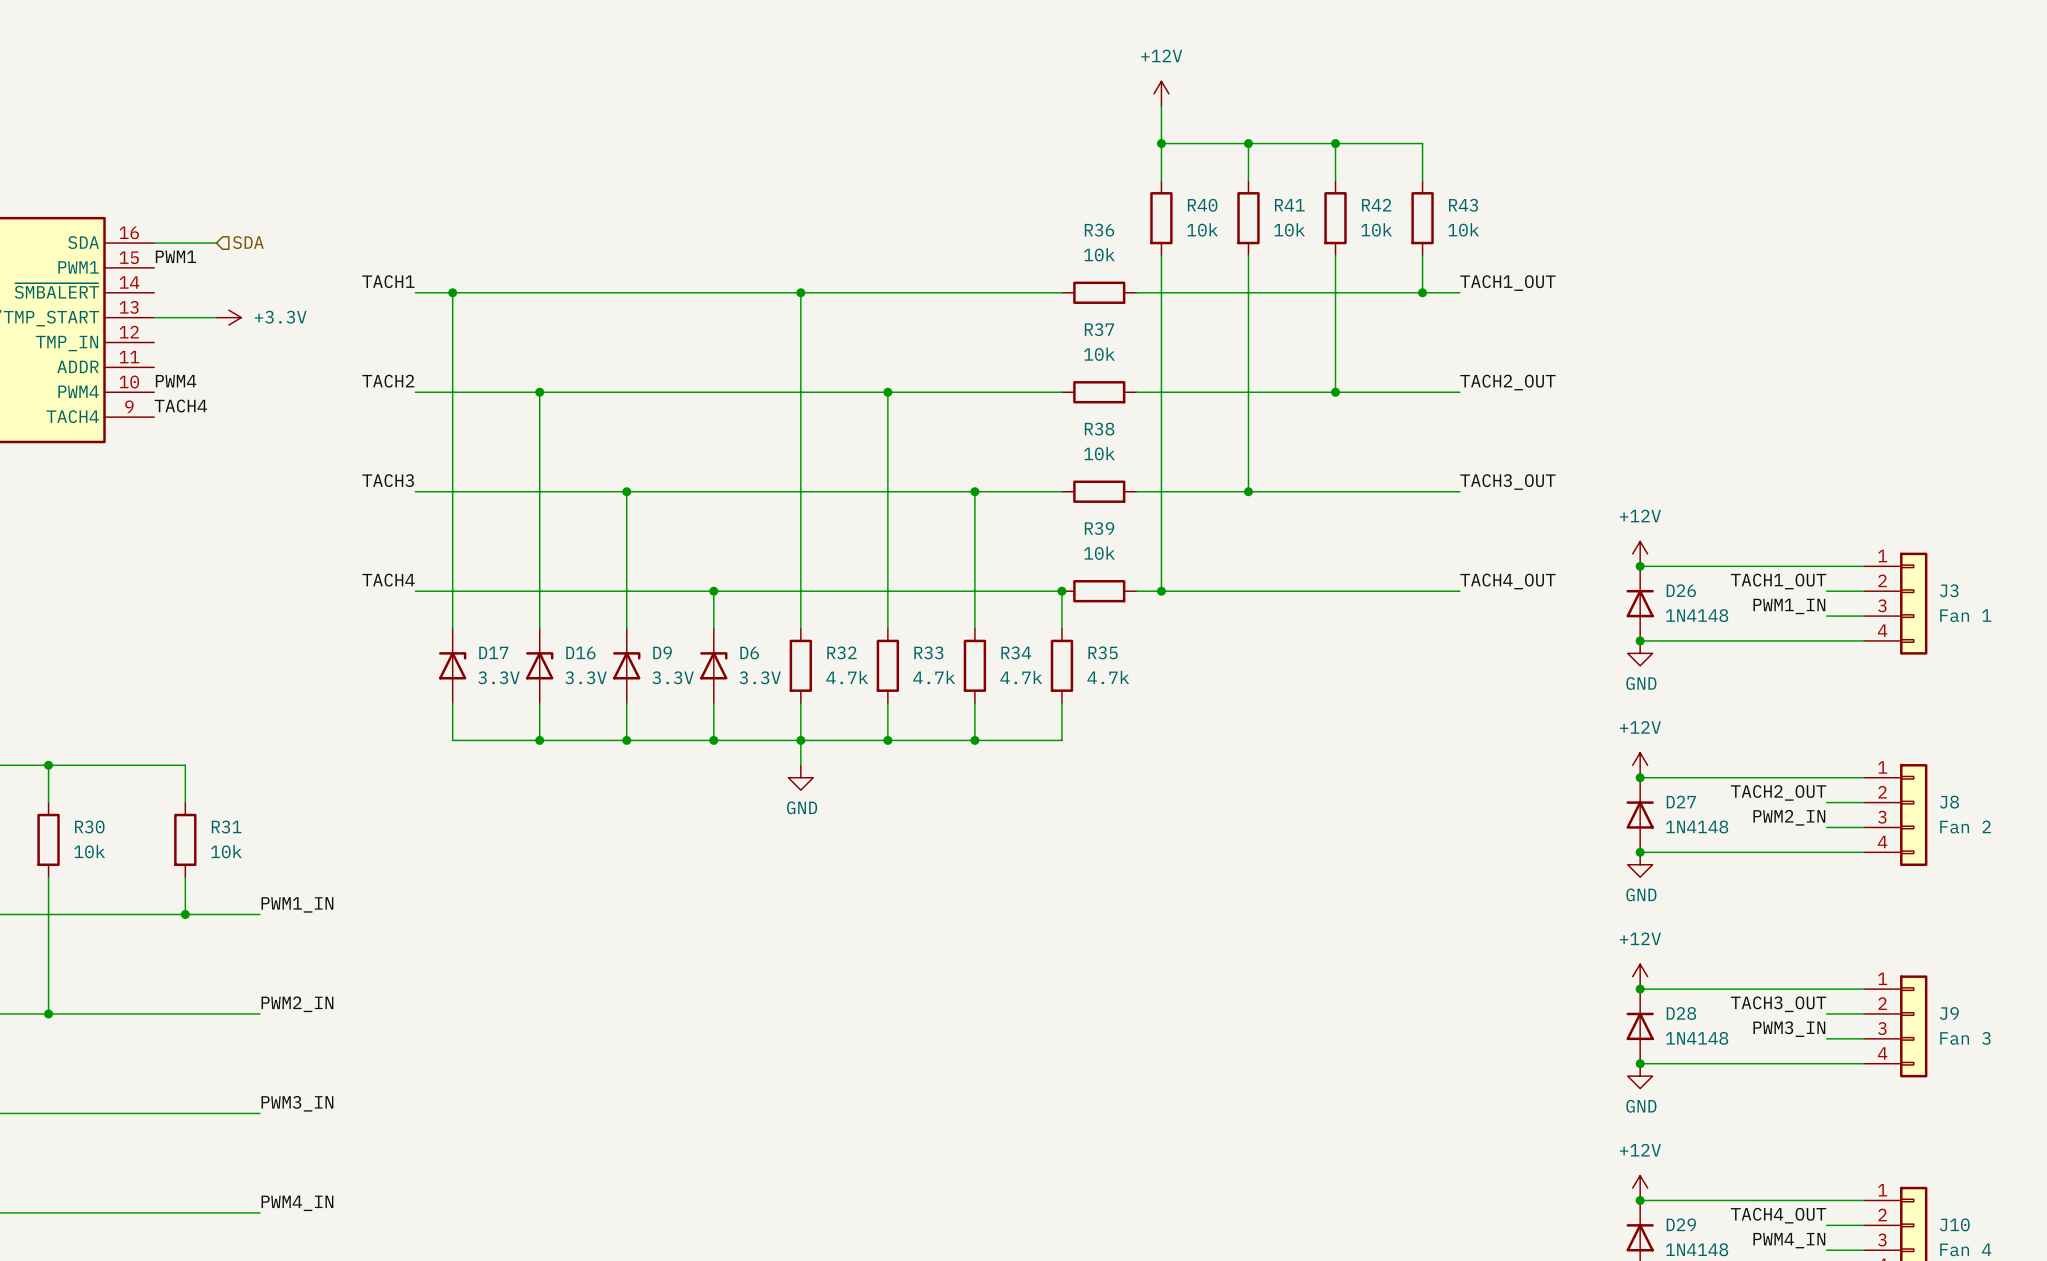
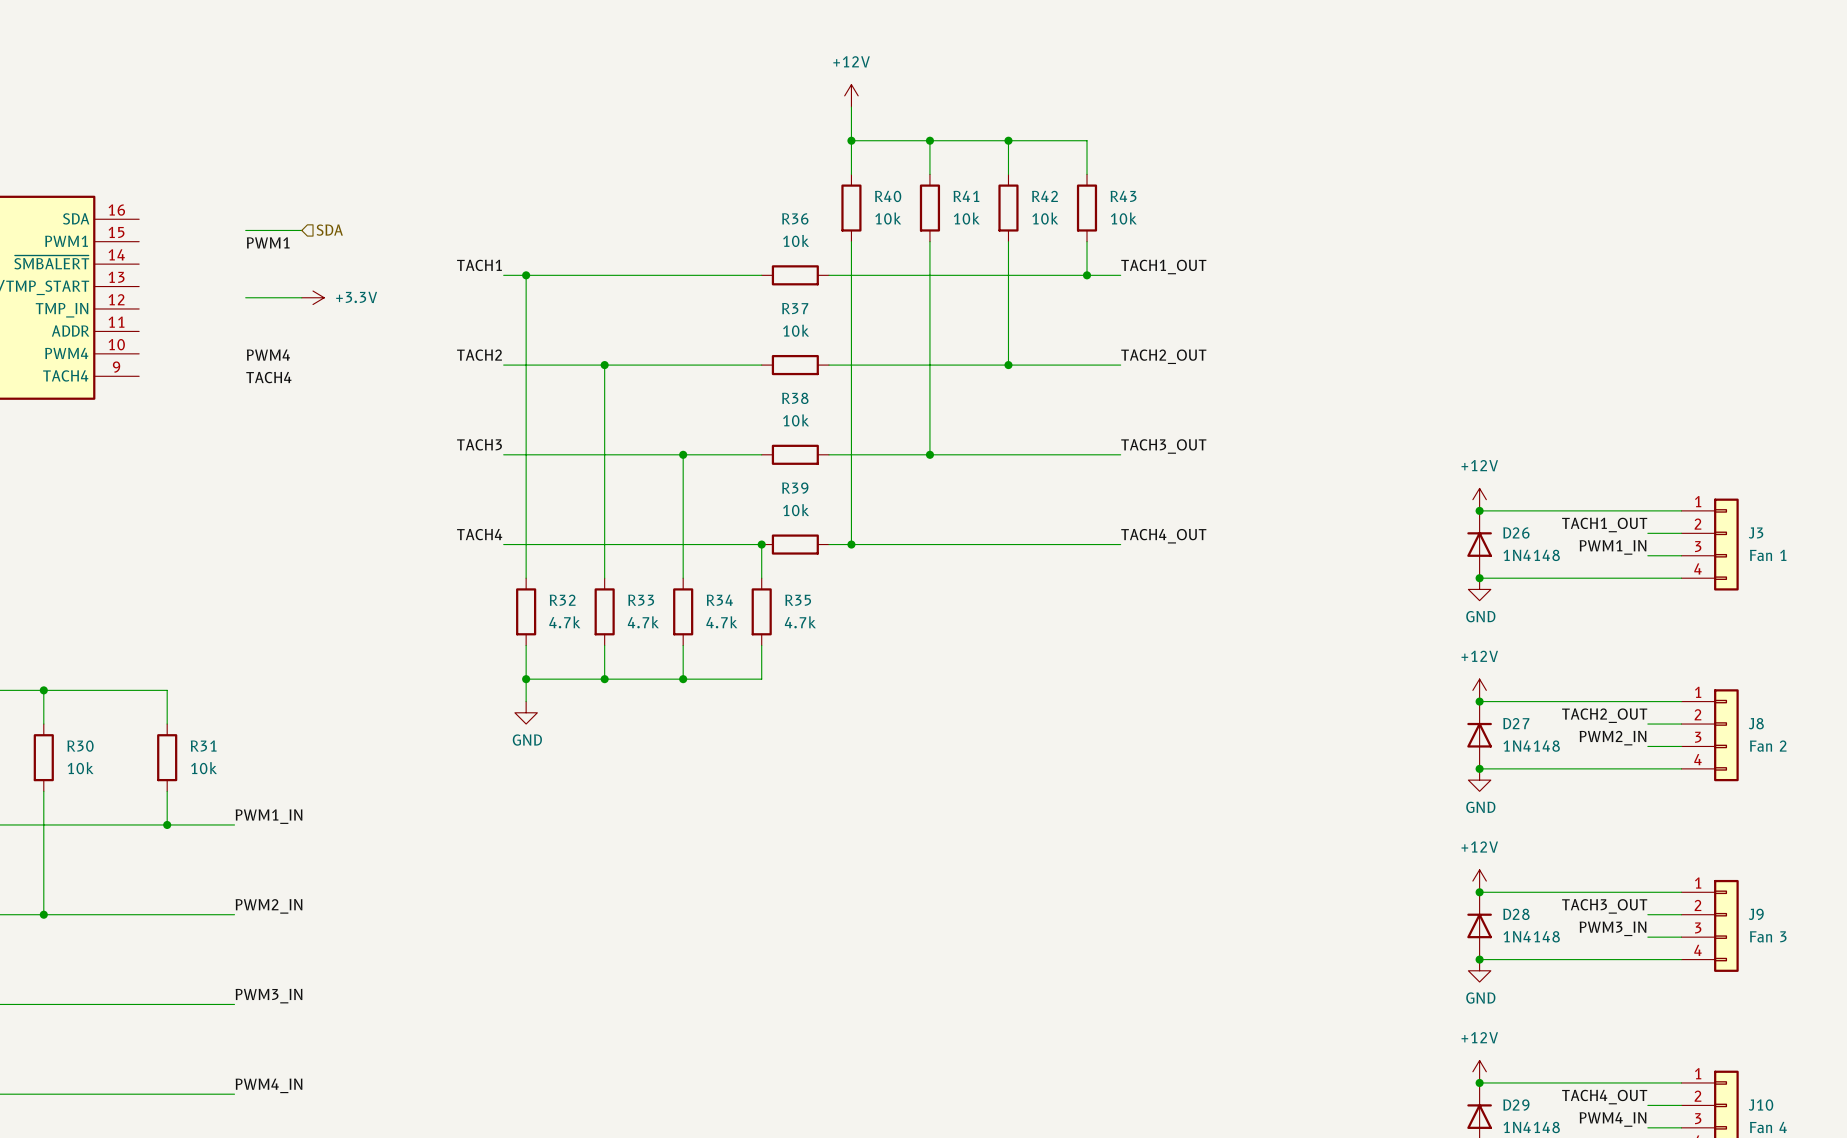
power symbol position: +12V (1161, 93) -> +12V (851, 95)
wire: (1161, 106) (1161, 180) -> (851, 107) (851, 174)
wire: (1161, 143) (1422, 143) (1422, 180) -> (851, 140) (1087, 140) (1087, 174)
junction position: (1161, 143) -> (1008, 140)
wire: (1248, 143) (1248, 180) -> (929, 140) (929, 174)
junction: (1248, 143) -> none
wire: (1335, 143) (1335, 180) -> (1008, 140) (1008, 174)
junction: (1335, 143) -> none
junction: none -> (851, 140)
junction: none -> (929, 140)
R40 position: (1161, 218) -> (851, 208)
R41 position: (1248, 218) -> (929, 208)
R42 position: (1335, 218) -> (1008, 208)
R43 position: (1422, 218) -> (1087, 208)
hierarchical label position: SDA (248, 242) -> SDA (329, 230)
wire: (154, 243) (216, 243) -> (245, 230) (301, 230)
wire: (1161, 255) (1161, 591) -> (851, 241) (851, 544)
wire: (1248, 255) (1248, 491) -> (929, 241) (929, 454)
wire: (1335, 255) (1335, 392) -> (1008, 241) (1008, 365)
wire: (1422, 255) (1422, 292) -> (1087, 241) (1087, 275)
label position: PWM1 (176, 256) -> PWM1 (268, 242)
label position: TACH1 (388, 281) -> TACH1 (479, 265)
label position: TACH1_OUT (1507, 283) -> TACH1_OUT (1163, 267)
wire: (415, 292) (1061, 292) -> none
wire: (452, 292) (452, 628) -> none
junction: (452, 292) -> none
wire: (800, 292) (800, 628) -> (526, 275) (526, 578)
junction: (800, 292) -> none
R36 position: (1099, 292) -> (795, 275)
wire: (1136, 292) (1459, 292) -> (829, 275) (1120, 275)
junction: (1422, 292) -> none
wire: none -> (503, 275) (761, 275)
junction: none -> (526, 275)
junction: none -> (1087, 275)
wire: (154, 317) (216, 317) -> (245, 297) (301, 297)
power symbol position: +3.3V (228, 317) -> +3.3V (313, 297)
label position: PWM4 (176, 381) -> PWM4 (268, 355)
label position: TACH2 (388, 381) -> TACH2 (479, 355)
label position: TACH2_OUT (1507, 382) -> TACH2_OUT (1163, 356)
wire: (415, 392) (1061, 392) -> none
wire: (539, 392) (539, 628) -> none
junction: (539, 392) -> none
wire: (887, 392) (887, 628) -> (604, 365) (604, 578)
junction: (887, 392) -> none
R37 position: (1099, 392) -> (795, 365)
wire: (1136, 392) (1459, 392) -> (829, 365) (1120, 365)
junction: (1335, 392) -> none
wire: none -> (503, 365) (761, 365)
junction: none -> (604, 365)
junction: none -> (1008, 365)
label: TACH4 (180, 406) -> none
label: none -> TACH4 (268, 377)
label position: TACH3 (388, 480) -> TACH3 (479, 444)
label position: TACH3_OUT (1507, 482) -> TACH3_OUT (1163, 446)
wire: (415, 491) (1061, 491) -> none
wire: (626, 491) (626, 628) -> none
junction: (626, 491) -> none
wire: (974, 491) (974, 628) -> (683, 454) (683, 578)
junction: (974, 491) -> none
R38 position: (1099, 491) -> (795, 454)
wire: (1136, 491) (1459, 491) -> (829, 454) (1120, 454)
junction: (1248, 491) -> none
wire: none -> (503, 454) (761, 454)
junction: none -> (683, 454)
junction: none -> (929, 454)
label: TACH4 (388, 580) -> none
label position: TACH4_OUT (1507, 581) -> TACH4_OUT (1163, 536)
wire: (415, 591) (1061, 591) (1061, 628) -> none
wire: (713, 591) (713, 628) -> none
junction: (713, 591) -> none
junction: (1061, 591) -> none
R39 position: (1099, 591) -> (795, 544)
wire: (1136, 591) (1459, 591) -> (829, 544) (1120, 544)
junction: (1161, 591) -> none
label: none -> TACH4 (479, 534)
wire: none -> (503, 544) (761, 544) (761, 578)
junction: none -> (761, 544)
junction: none -> (851, 544)
D17: 3.3V (452, 665) -> none
D16: 3.3V (539, 665) -> none
D9: 3.3V (626, 665) -> none
D6: 3.3V (713, 665) -> none
R32 position: (800, 665) -> (526, 611)
R33 position: (887, 665) -> (604, 611)
R34 position: (974, 665) -> (683, 611)
R35 position: (1061, 665) -> (761, 611)
wire: (452, 703) (452, 740) (1061, 740) (1061, 703) -> none
wire: (539, 703) (539, 740) -> none
wire: (626, 703) (626, 740) -> none
wire: (713, 703) (713, 740) -> none
wire: (800, 703) (800, 765) -> (526, 645) (526, 701)
wire: (887, 703) (887, 740) -> (604, 645) (604, 679)
wire: (974, 703) (974, 740) -> (683, 645) (683, 679)
wire: none -> (761, 645) (761, 679) (526, 679)
junction: (539, 740) -> none
junction: (626, 740) -> none
junction: (713, 740) -> none
junction: (800, 740) -> none
junction: (887, 740) -> none
junction: (974, 740) -> none
junction: none -> (526, 679)
junction: none -> (604, 679)
junction: none -> (683, 679)
power symbol position: GND (800, 777) -> GND (526, 712)

